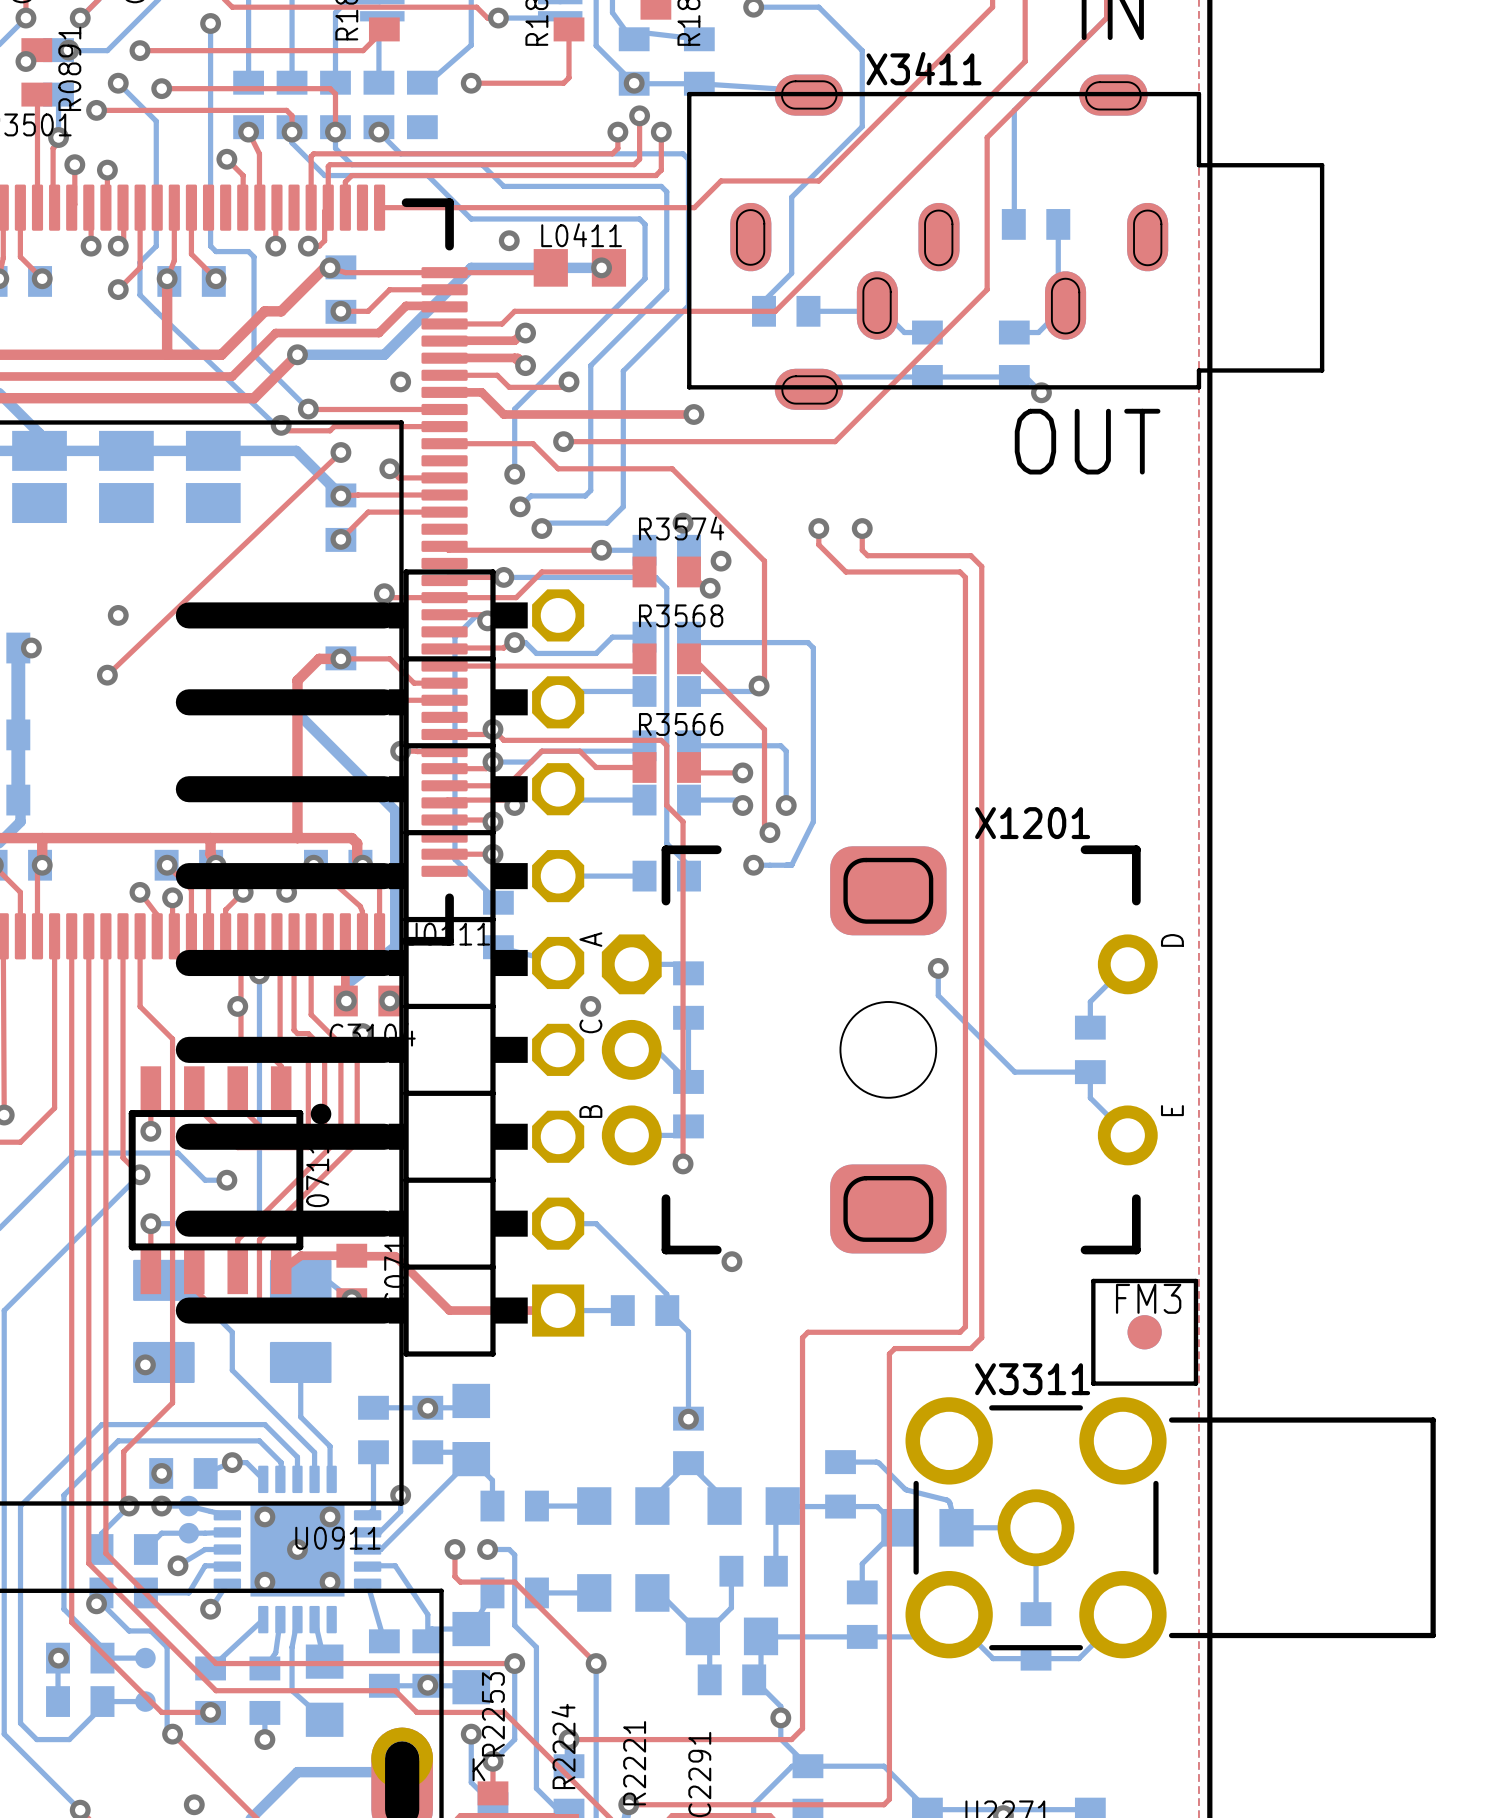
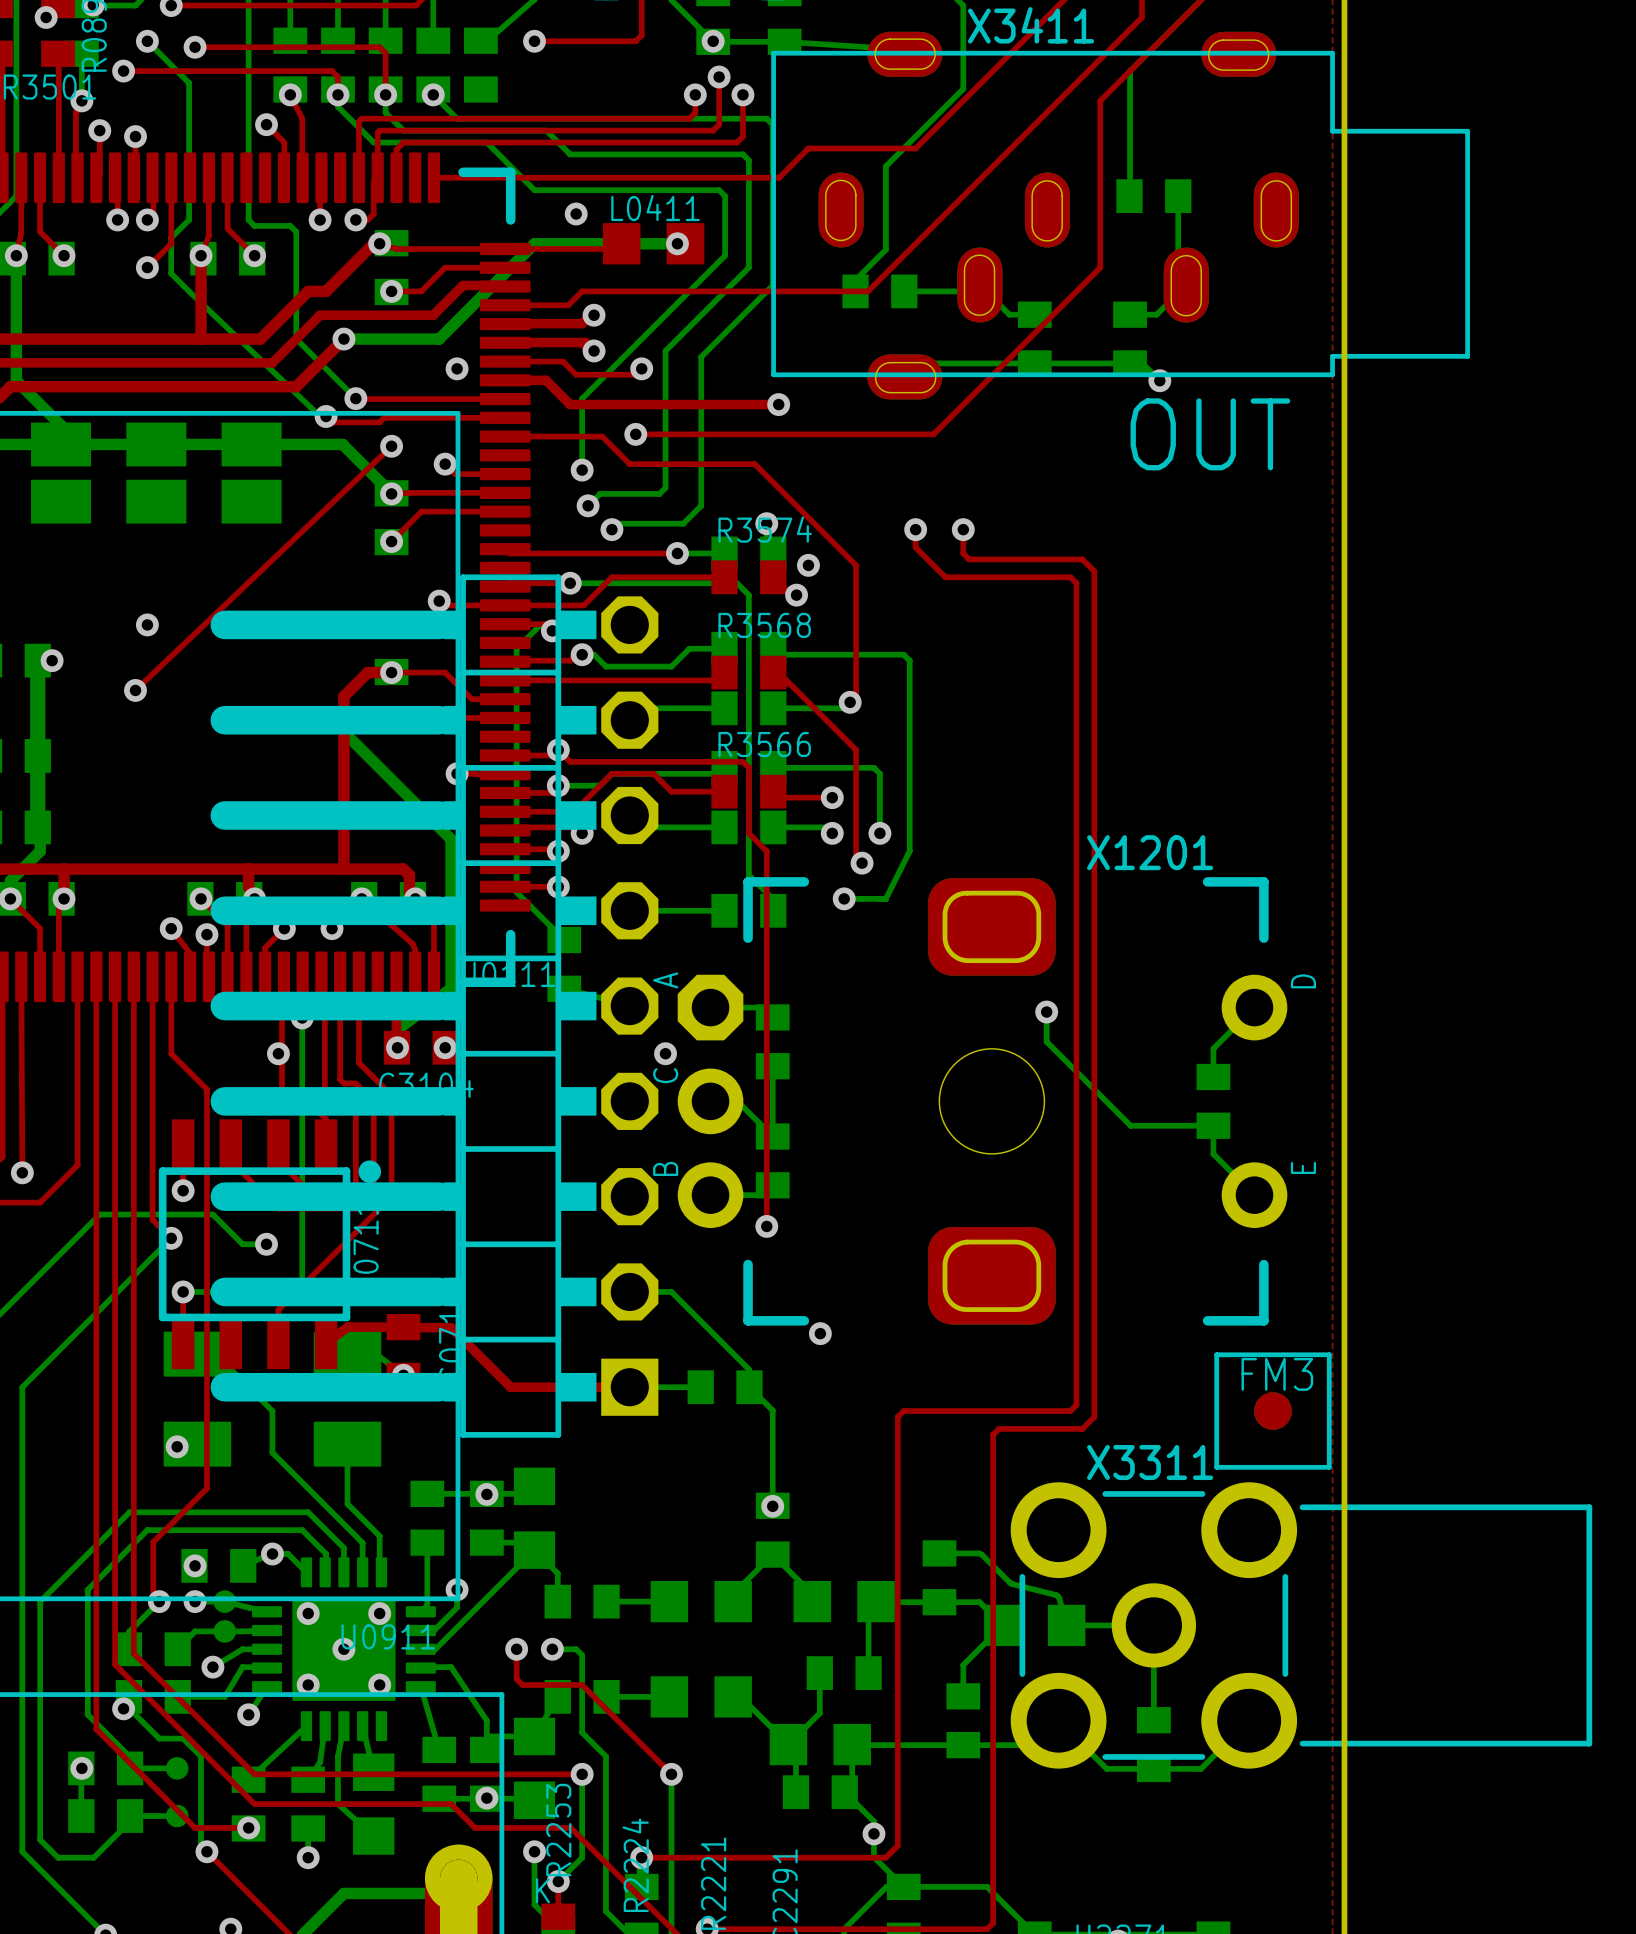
top track: (362, 1033) (357, 1039) (357, 1142) (259, 1239) (259, 1299) (248, 1310) (216, 1310) (194, 1288) (194, 1270) -> none
via: (362, 1033) -> none

